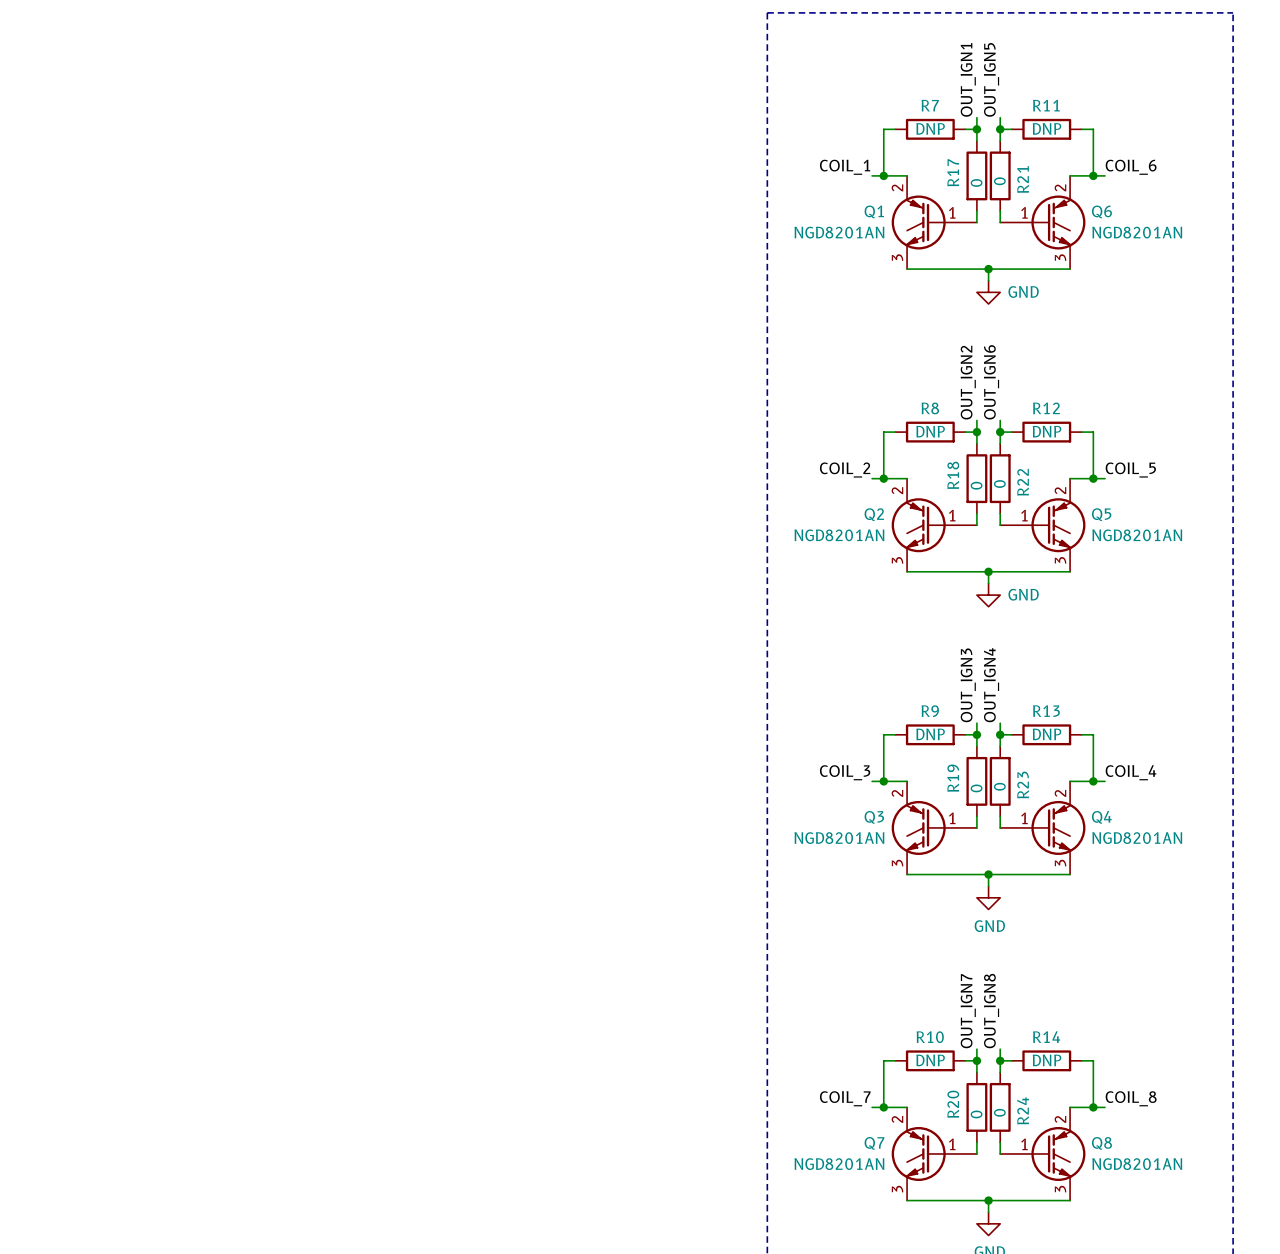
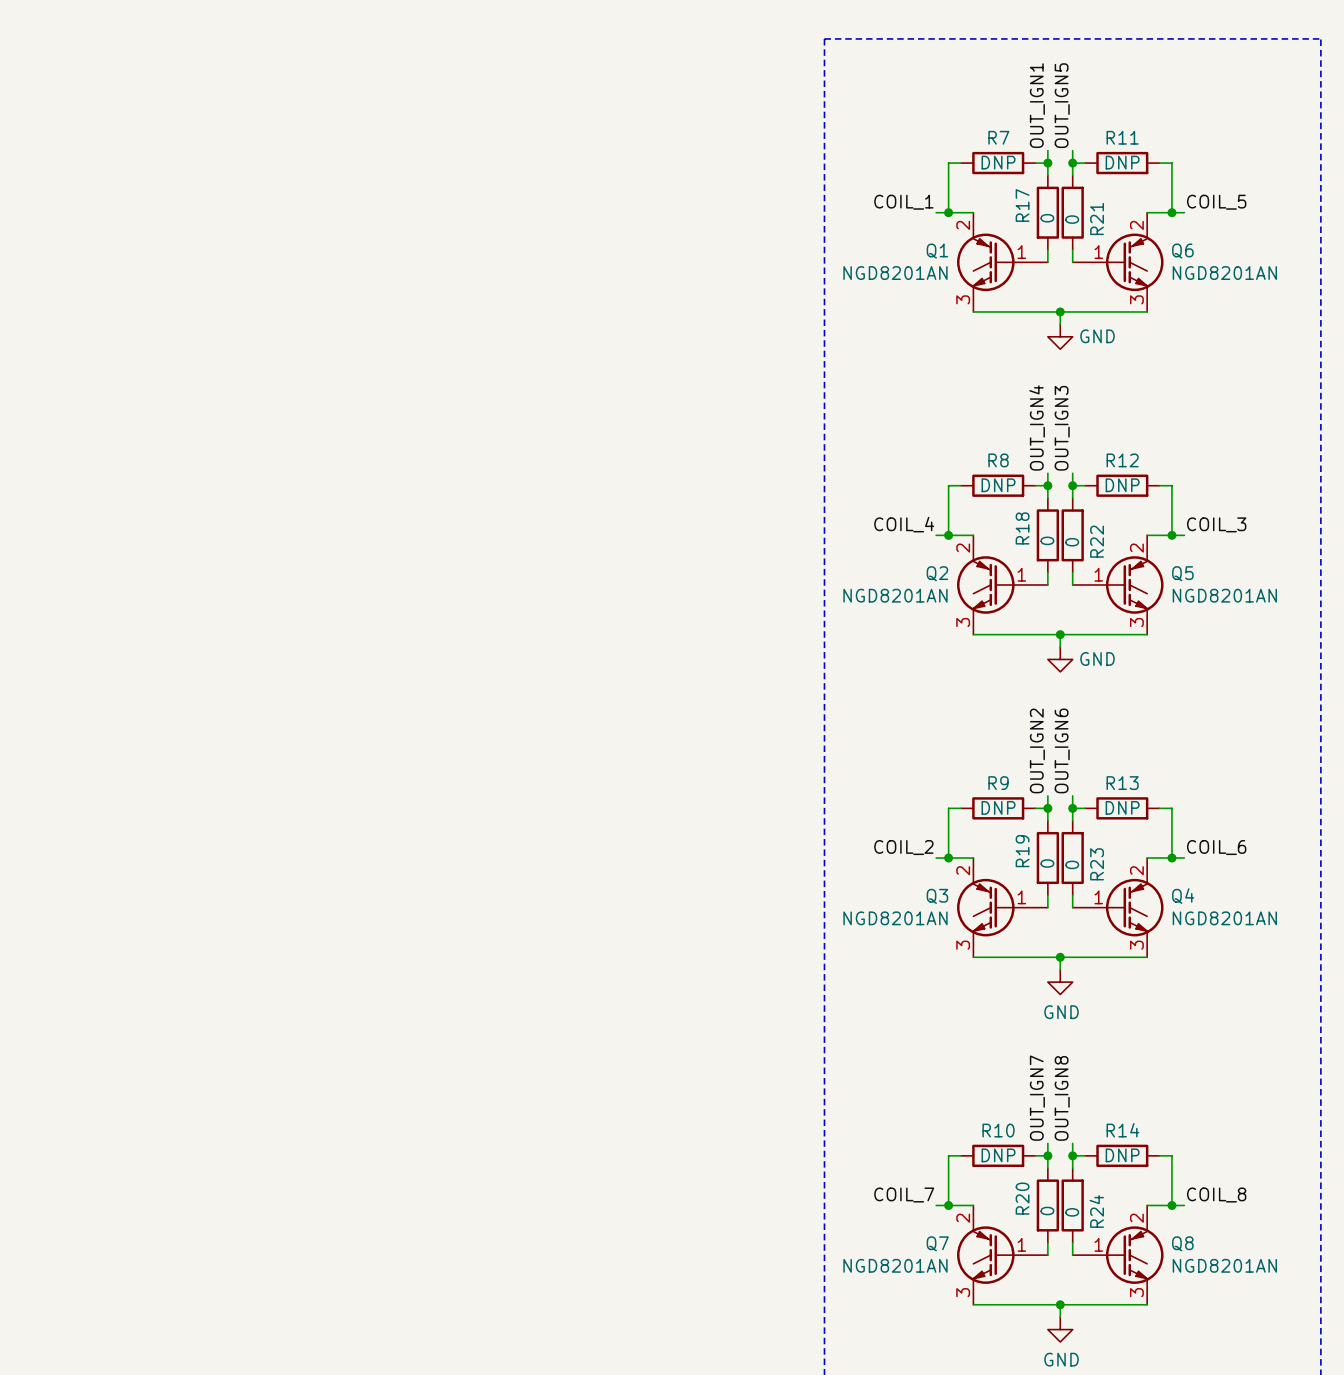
label: COIL_6 (1131, 167) -> COIL_5 (1216, 202)
label: OUT_IGN2 (968, 382) -> OUT_IGN4 (1037, 428)
label: OUT_IGN6 (991, 382) -> OUT_IGN3 (1062, 428)
label: COIL_2 (845, 470) -> COIL_4 (904, 524)
label: COIL_5 (1130, 470) -> COIL_3 (1216, 524)
label: OUT_IGN3 (968, 685) -> OUT_IGN2 (1037, 750)
label: OUT_IGN4 (991, 685) -> OUT_IGN6 (1062, 750)
label: COIL_3 (845, 772) -> COIL_2 (903, 847)
label: COIL_4 (1131, 772) -> COIL_6 (1216, 847)

